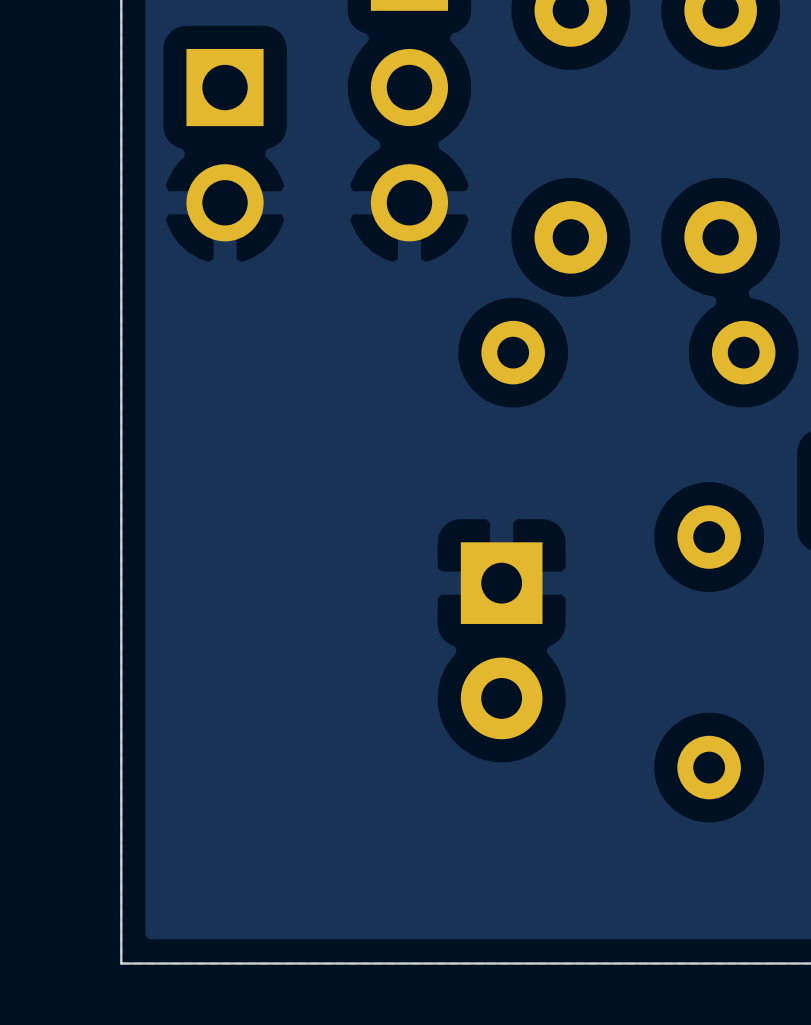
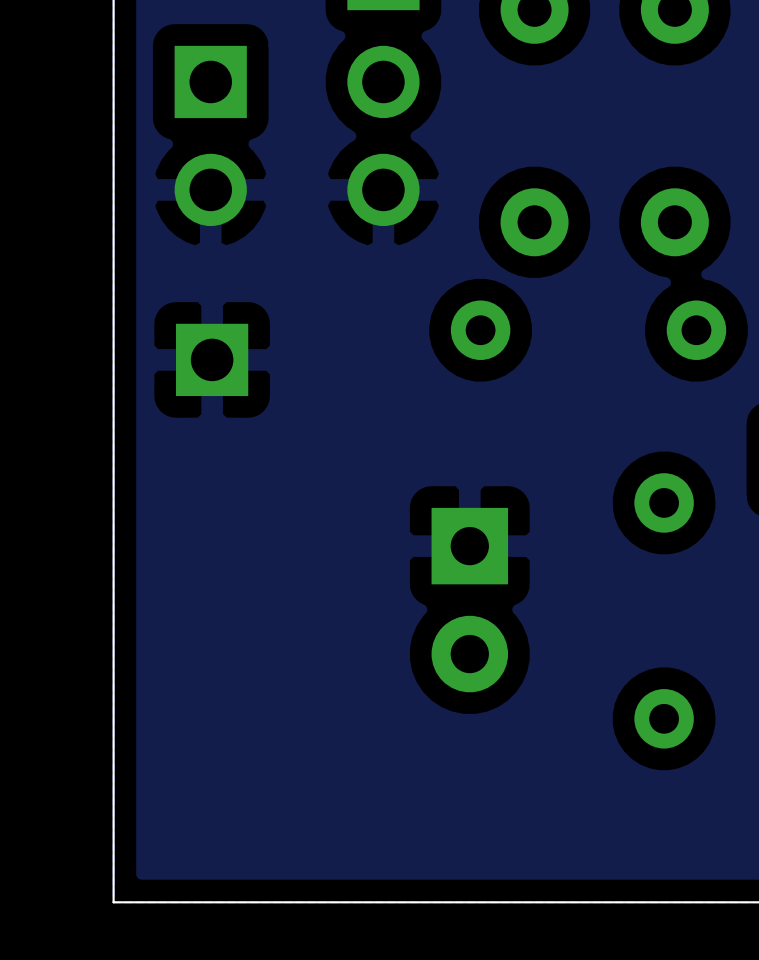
part: none -> (212, 359)

